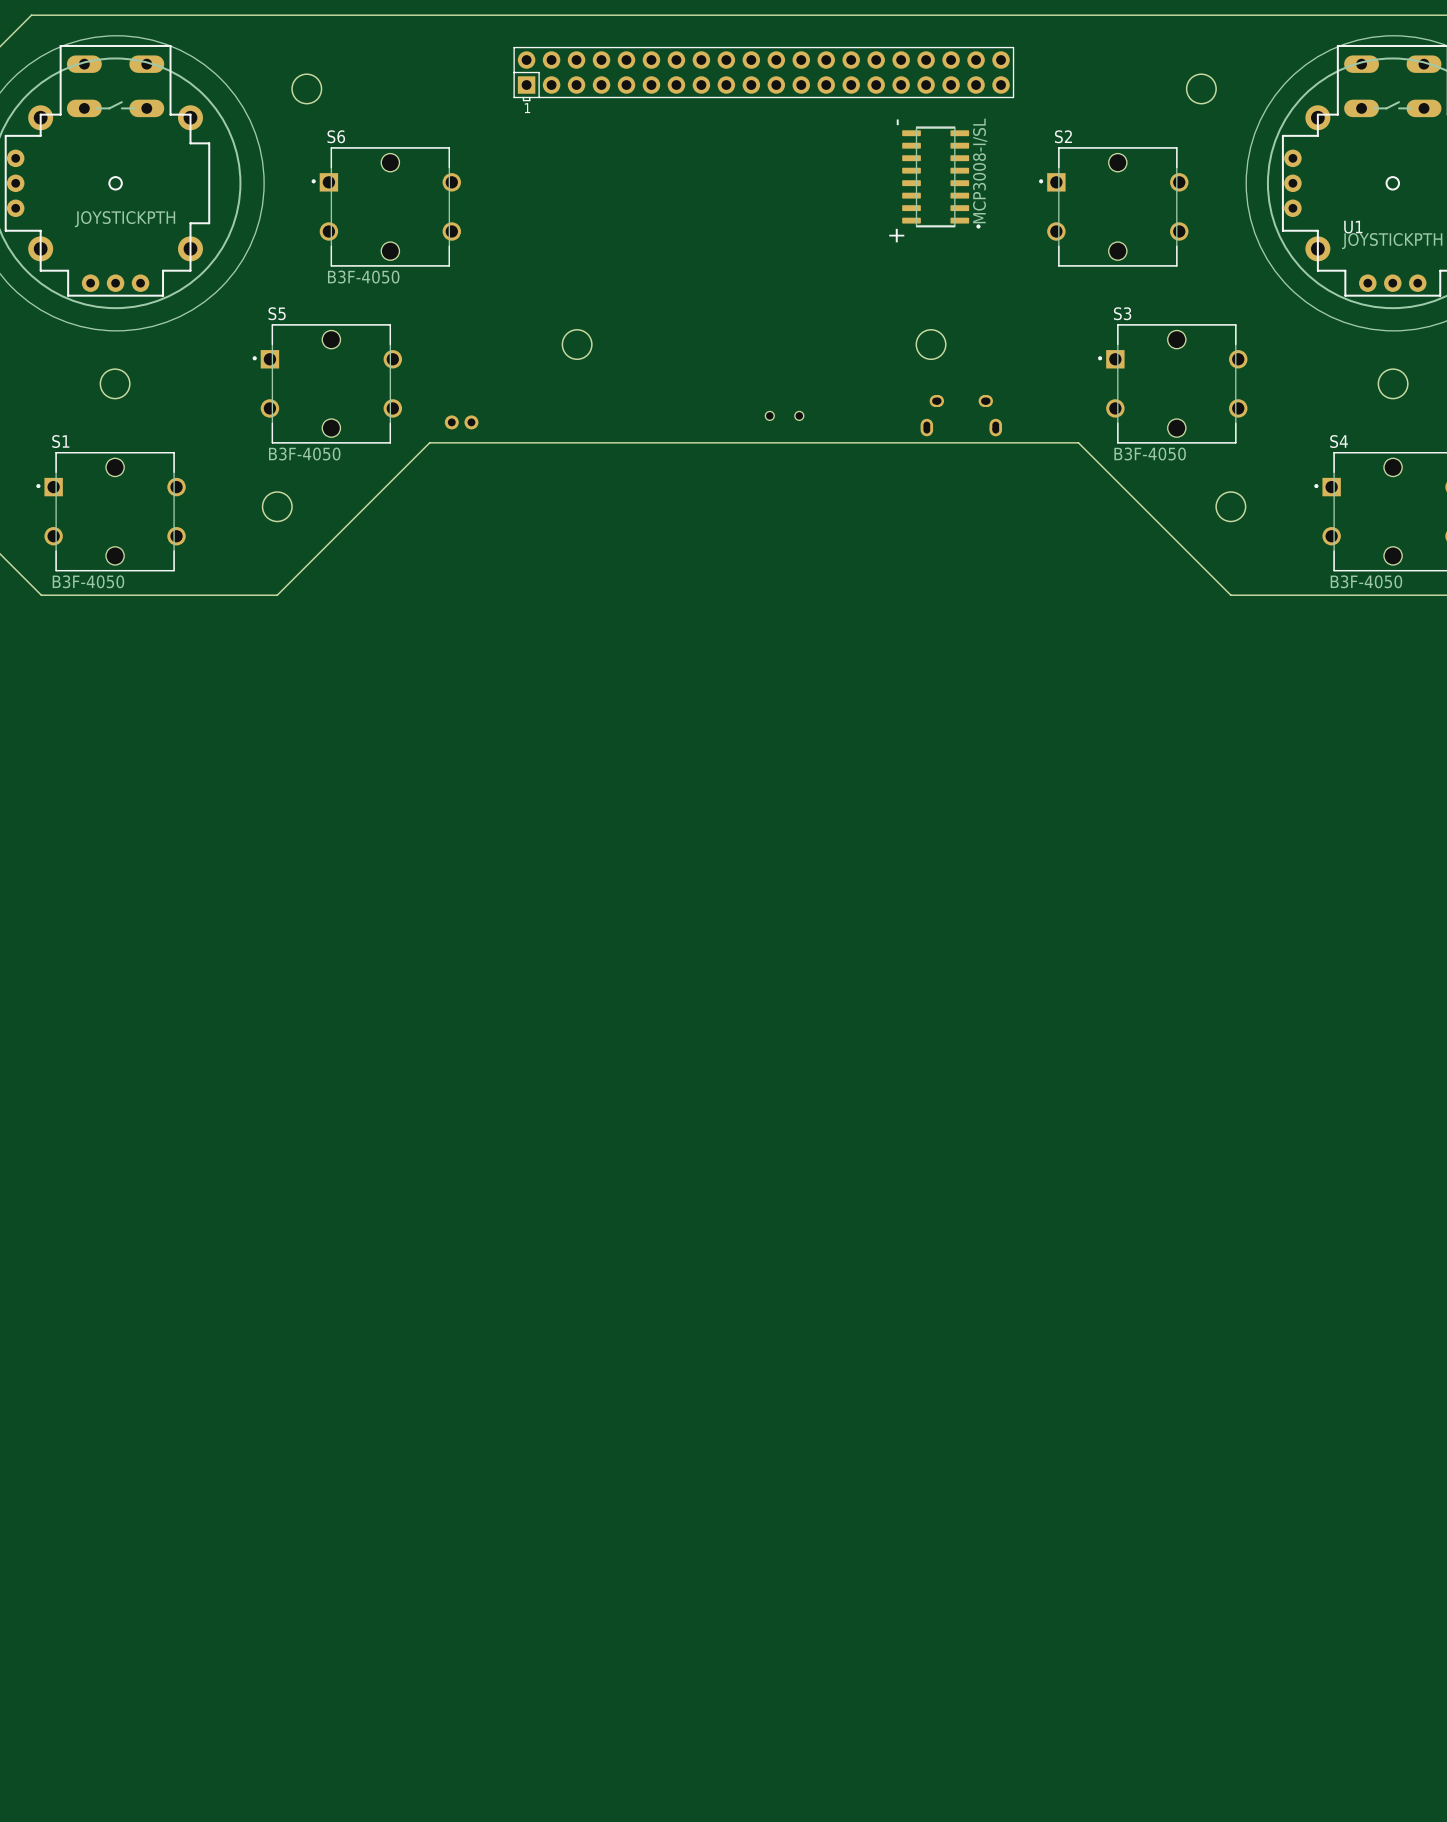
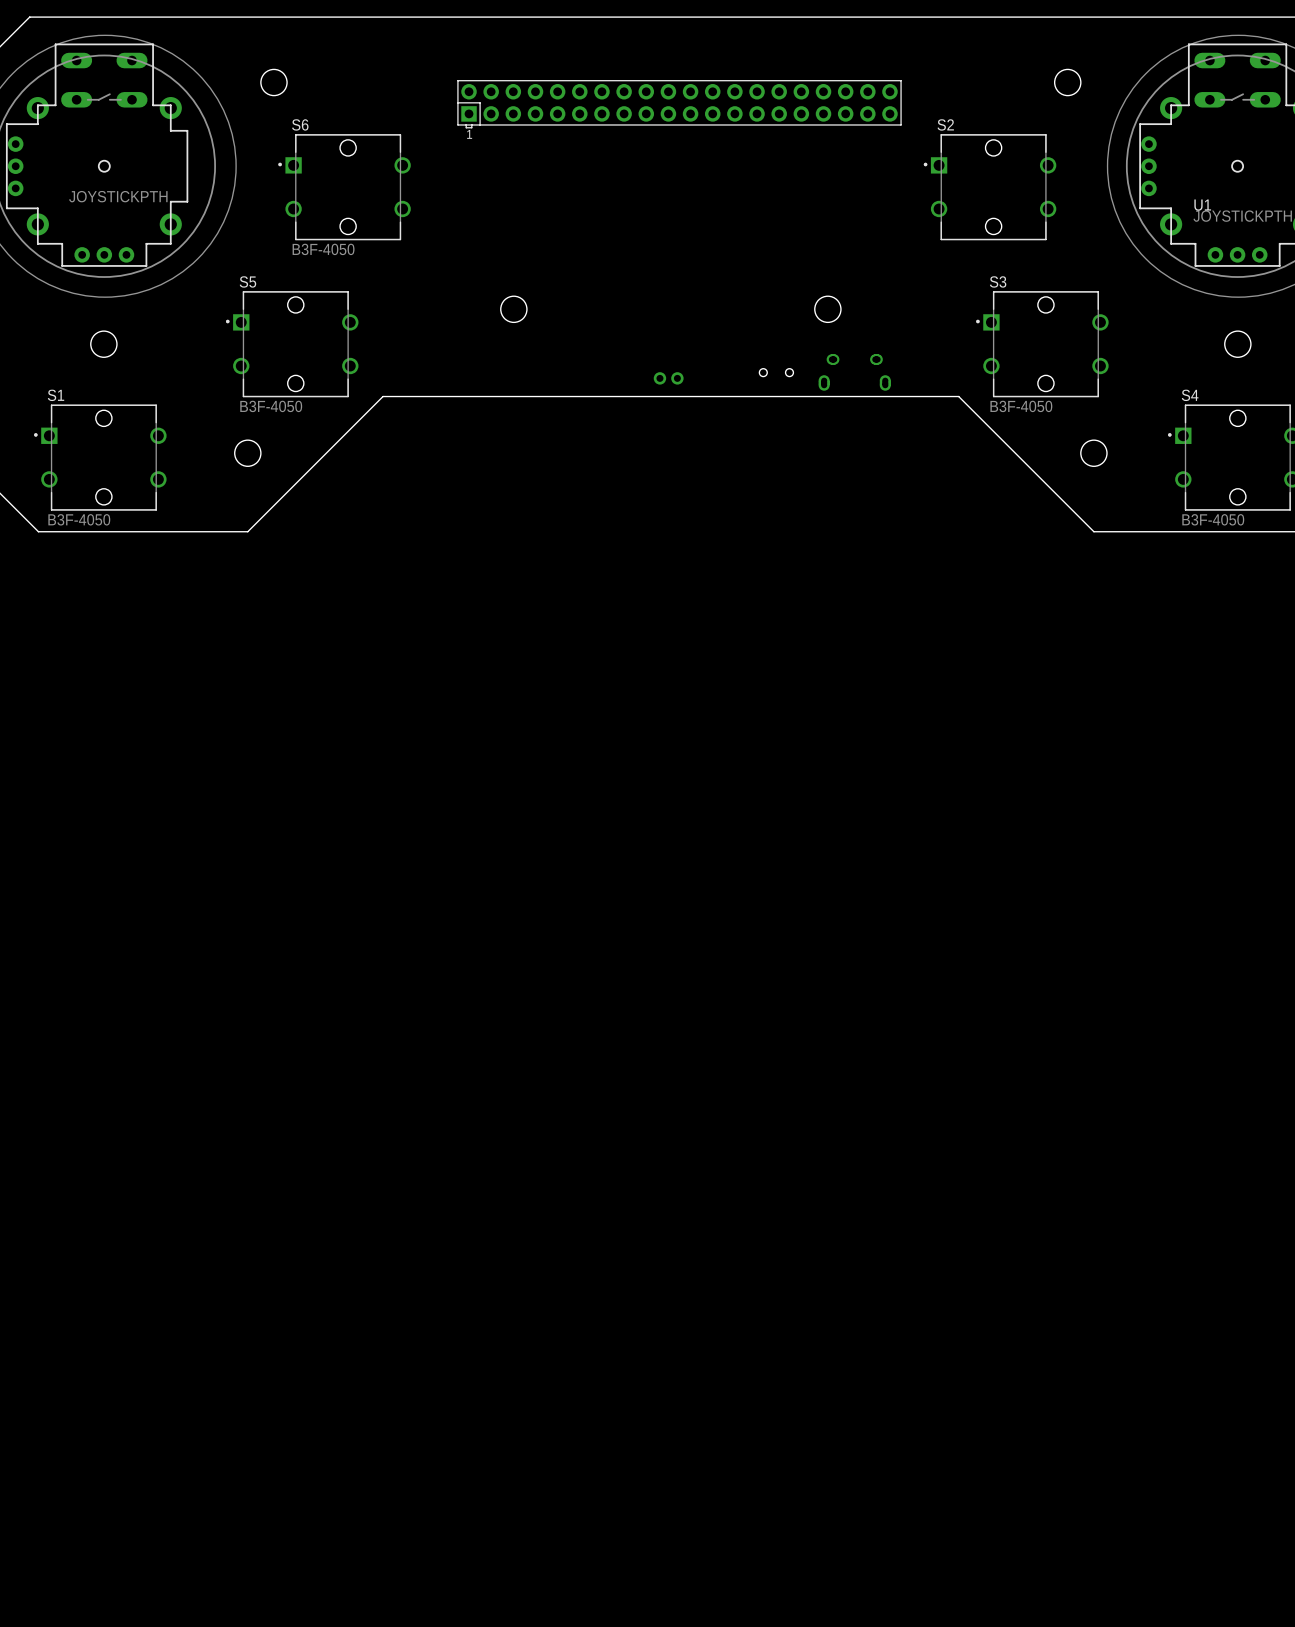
part position: (763, 74) -> (679, 104)
text: - (897, 122) -> none
part: MCP3008-I/SL (941, 177) -> none
text: + (896, 235) -> none
part position: (784, 415) -> (776, 372)
part: (461, 422) -> none
part: none -> (668, 378)

